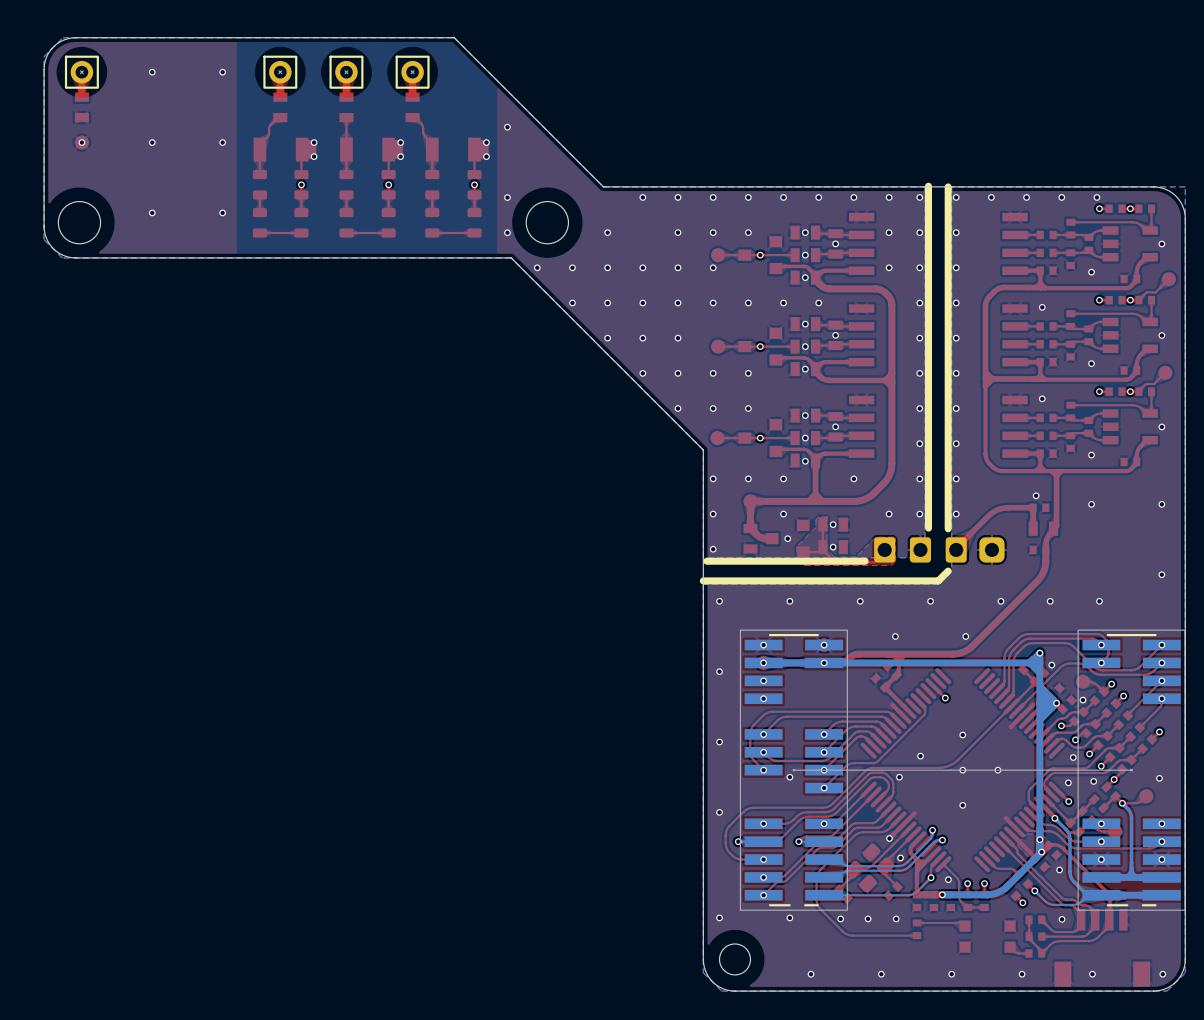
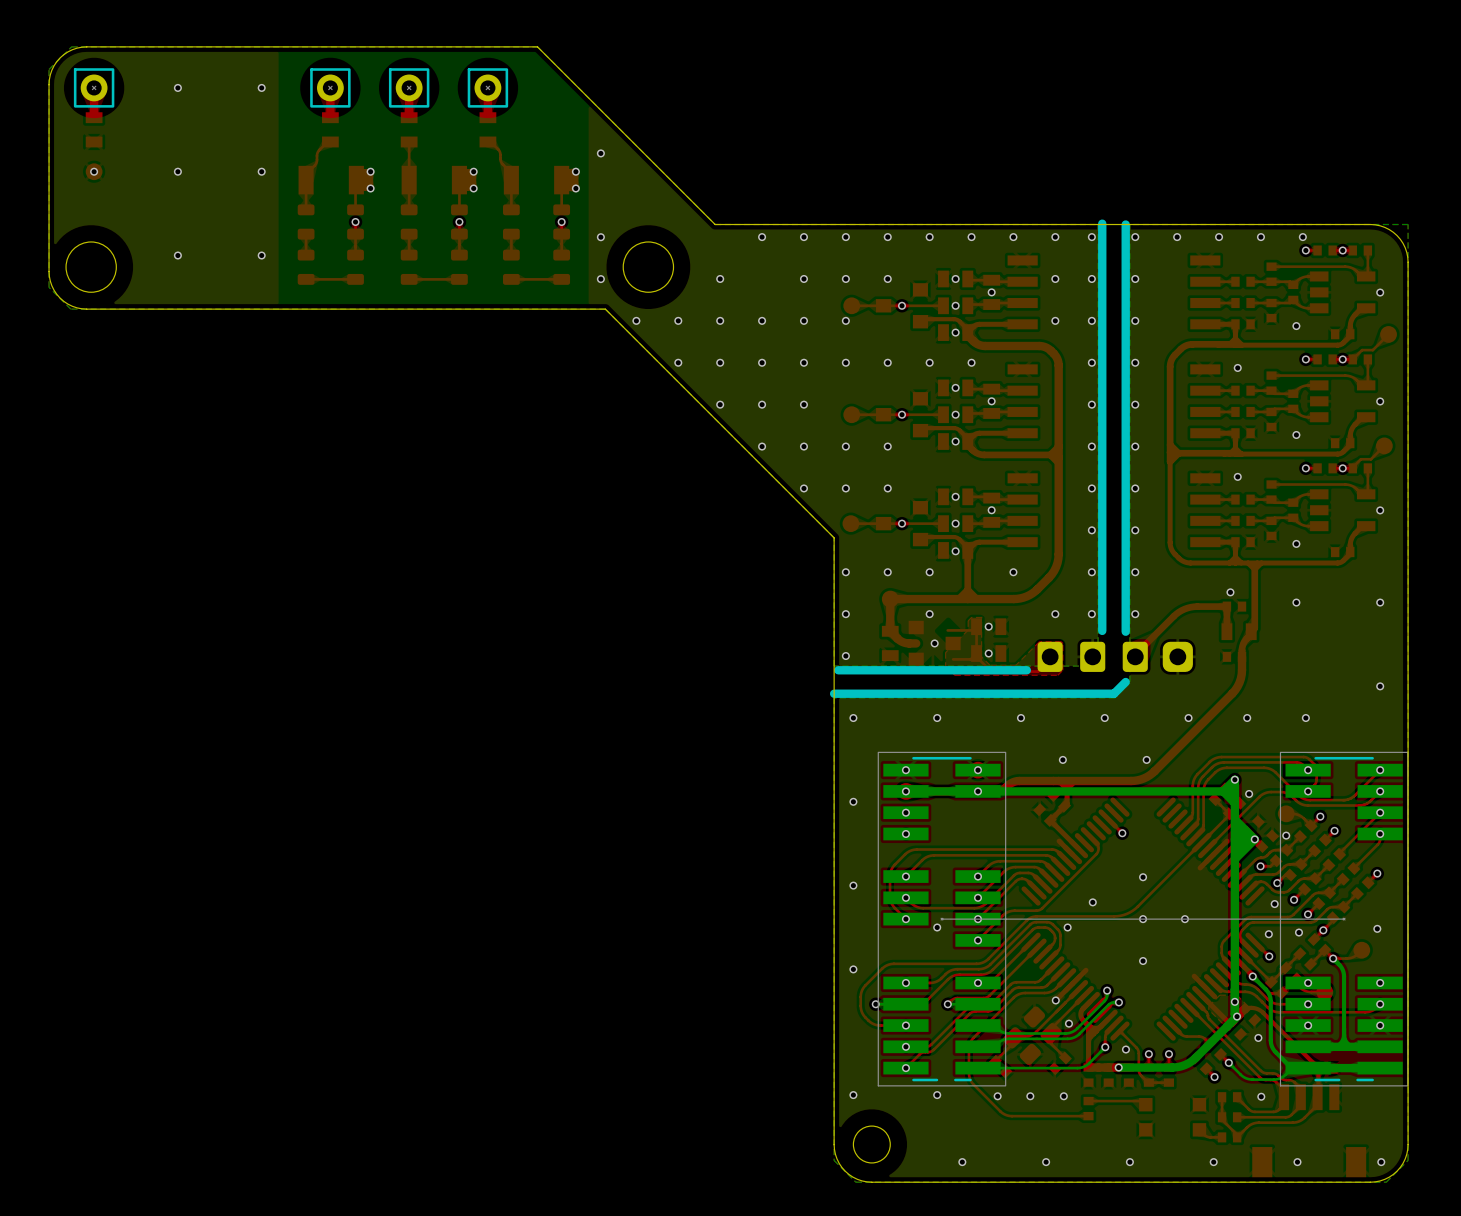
top track: none -> (976, 626) (972, 630) (947, 630)
part rotation: 0° (787, 538) -> 180° (934, 643)

